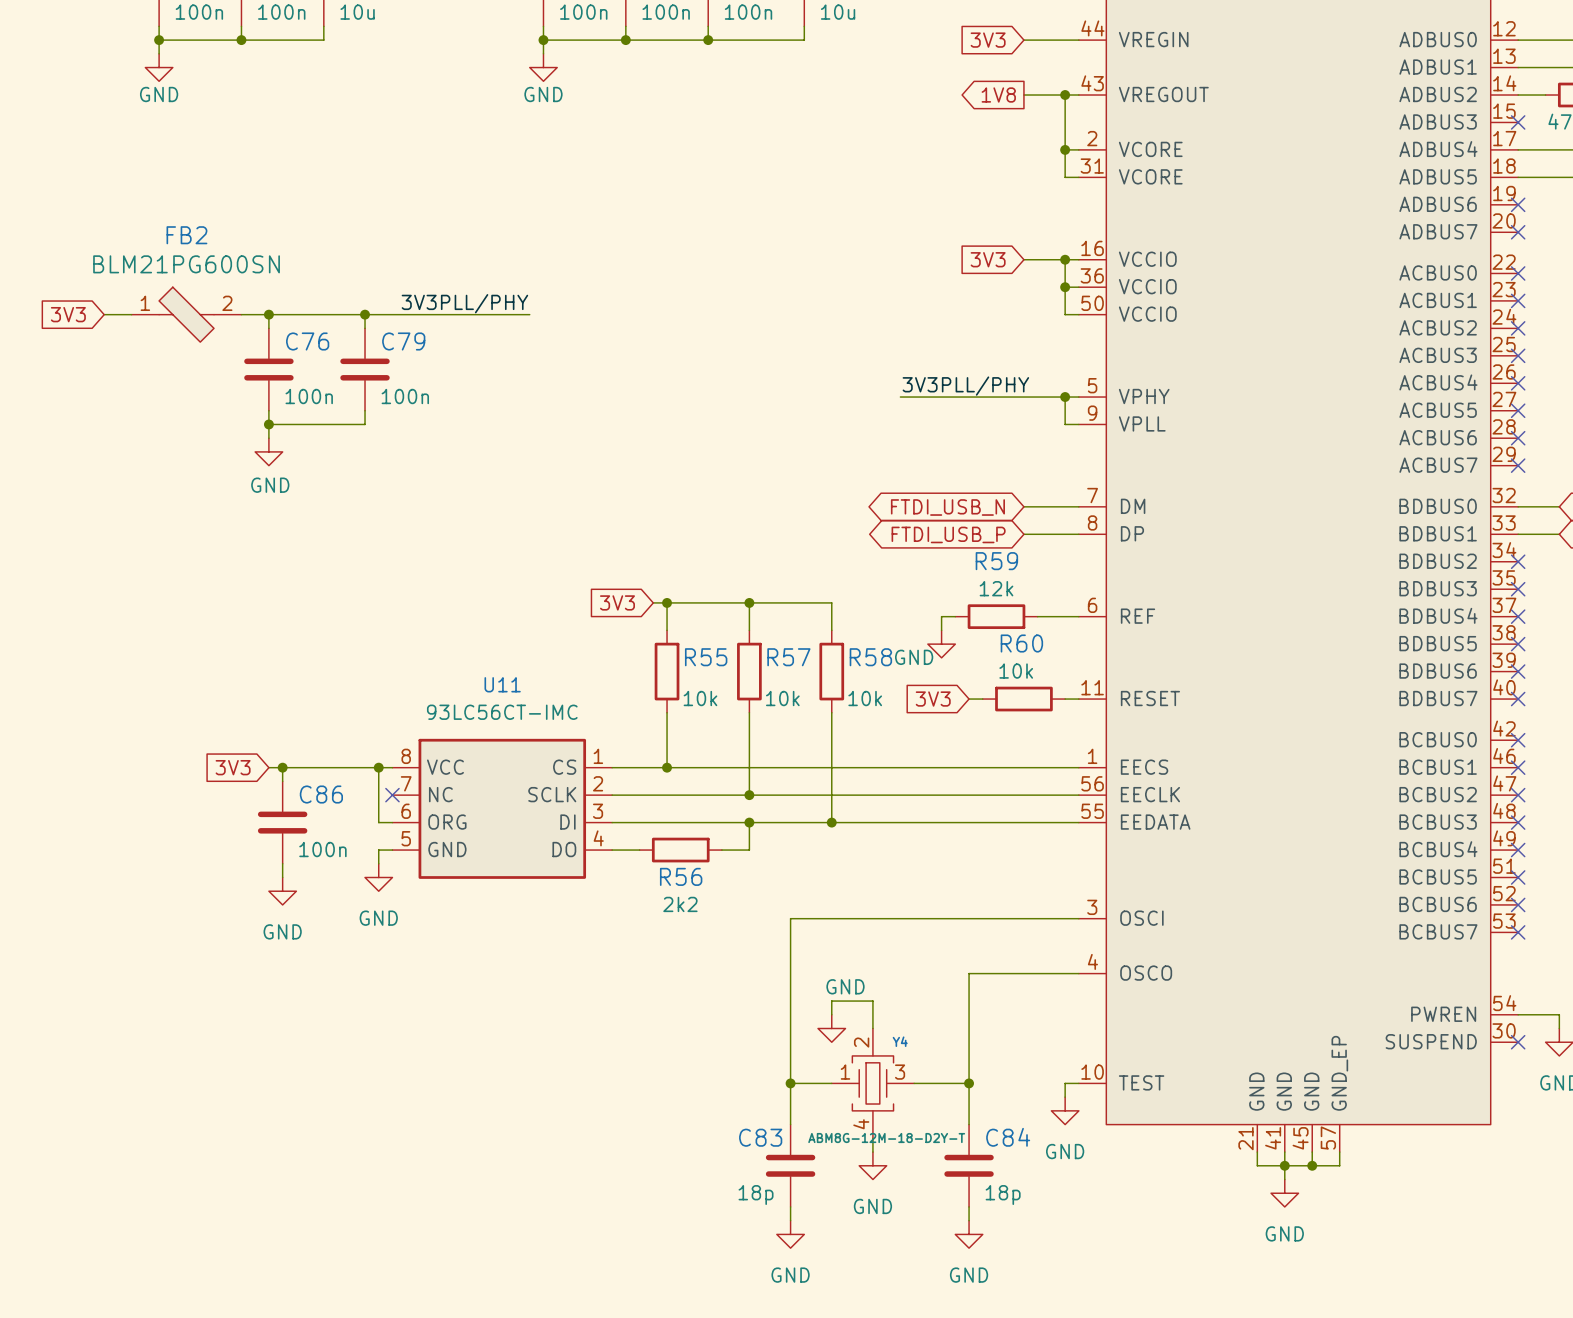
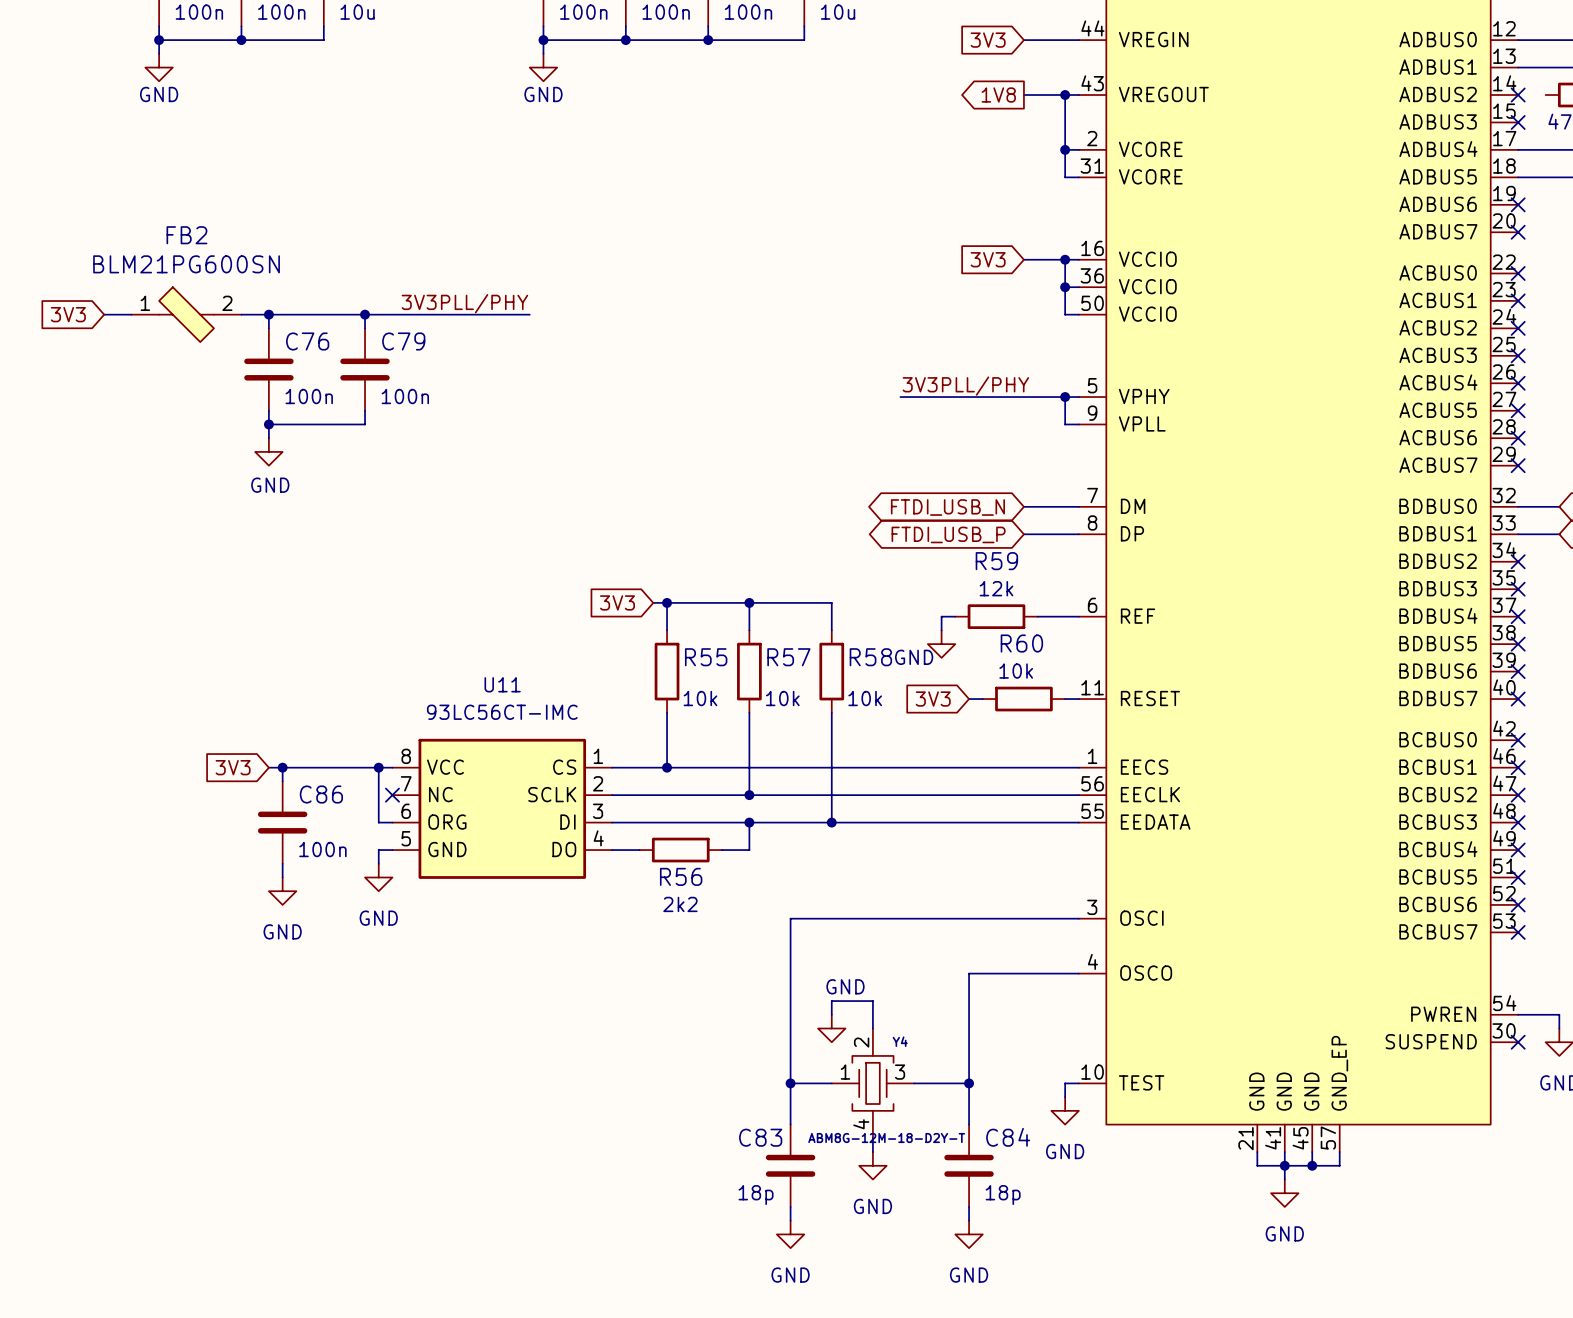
wire: (1518, 95) (1545, 95) -> none
no-connect mark: none -> (1518, 95)

